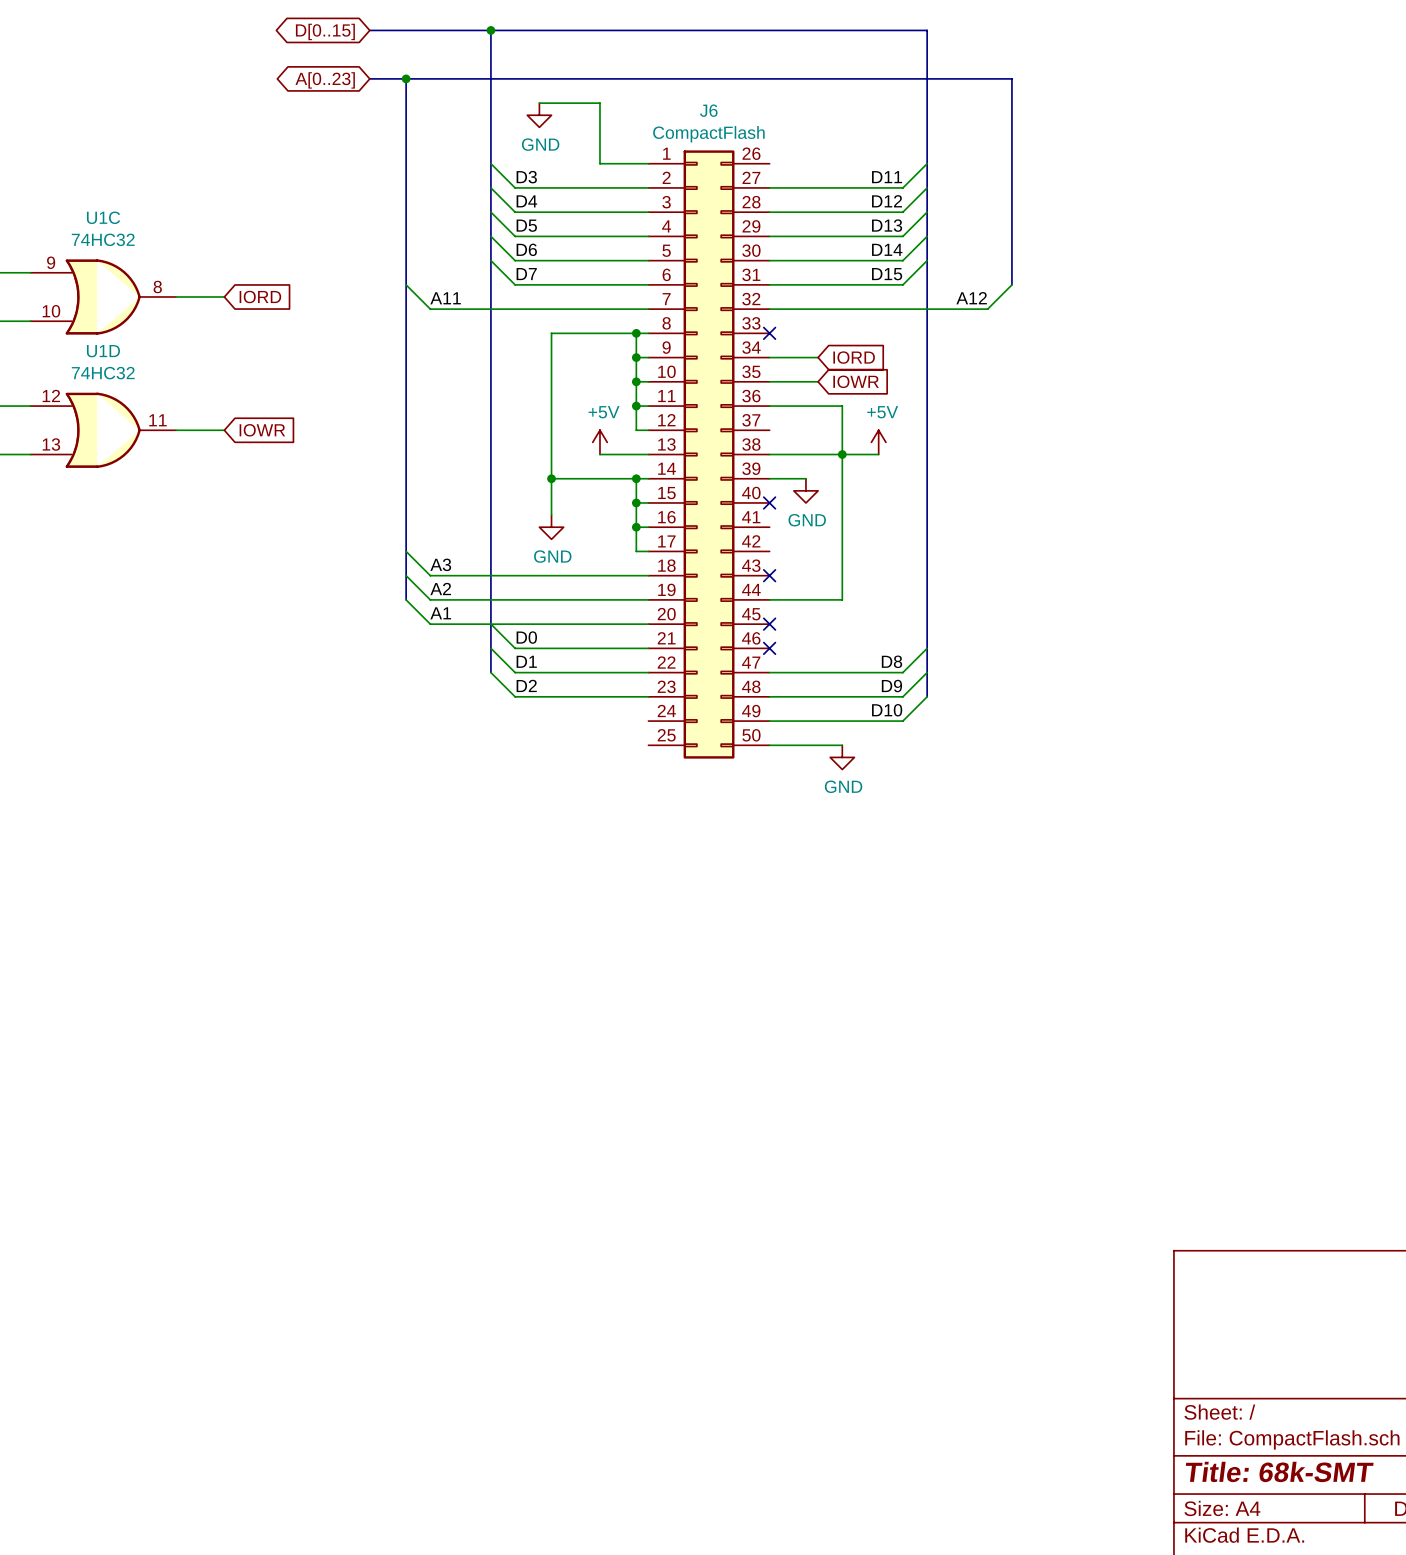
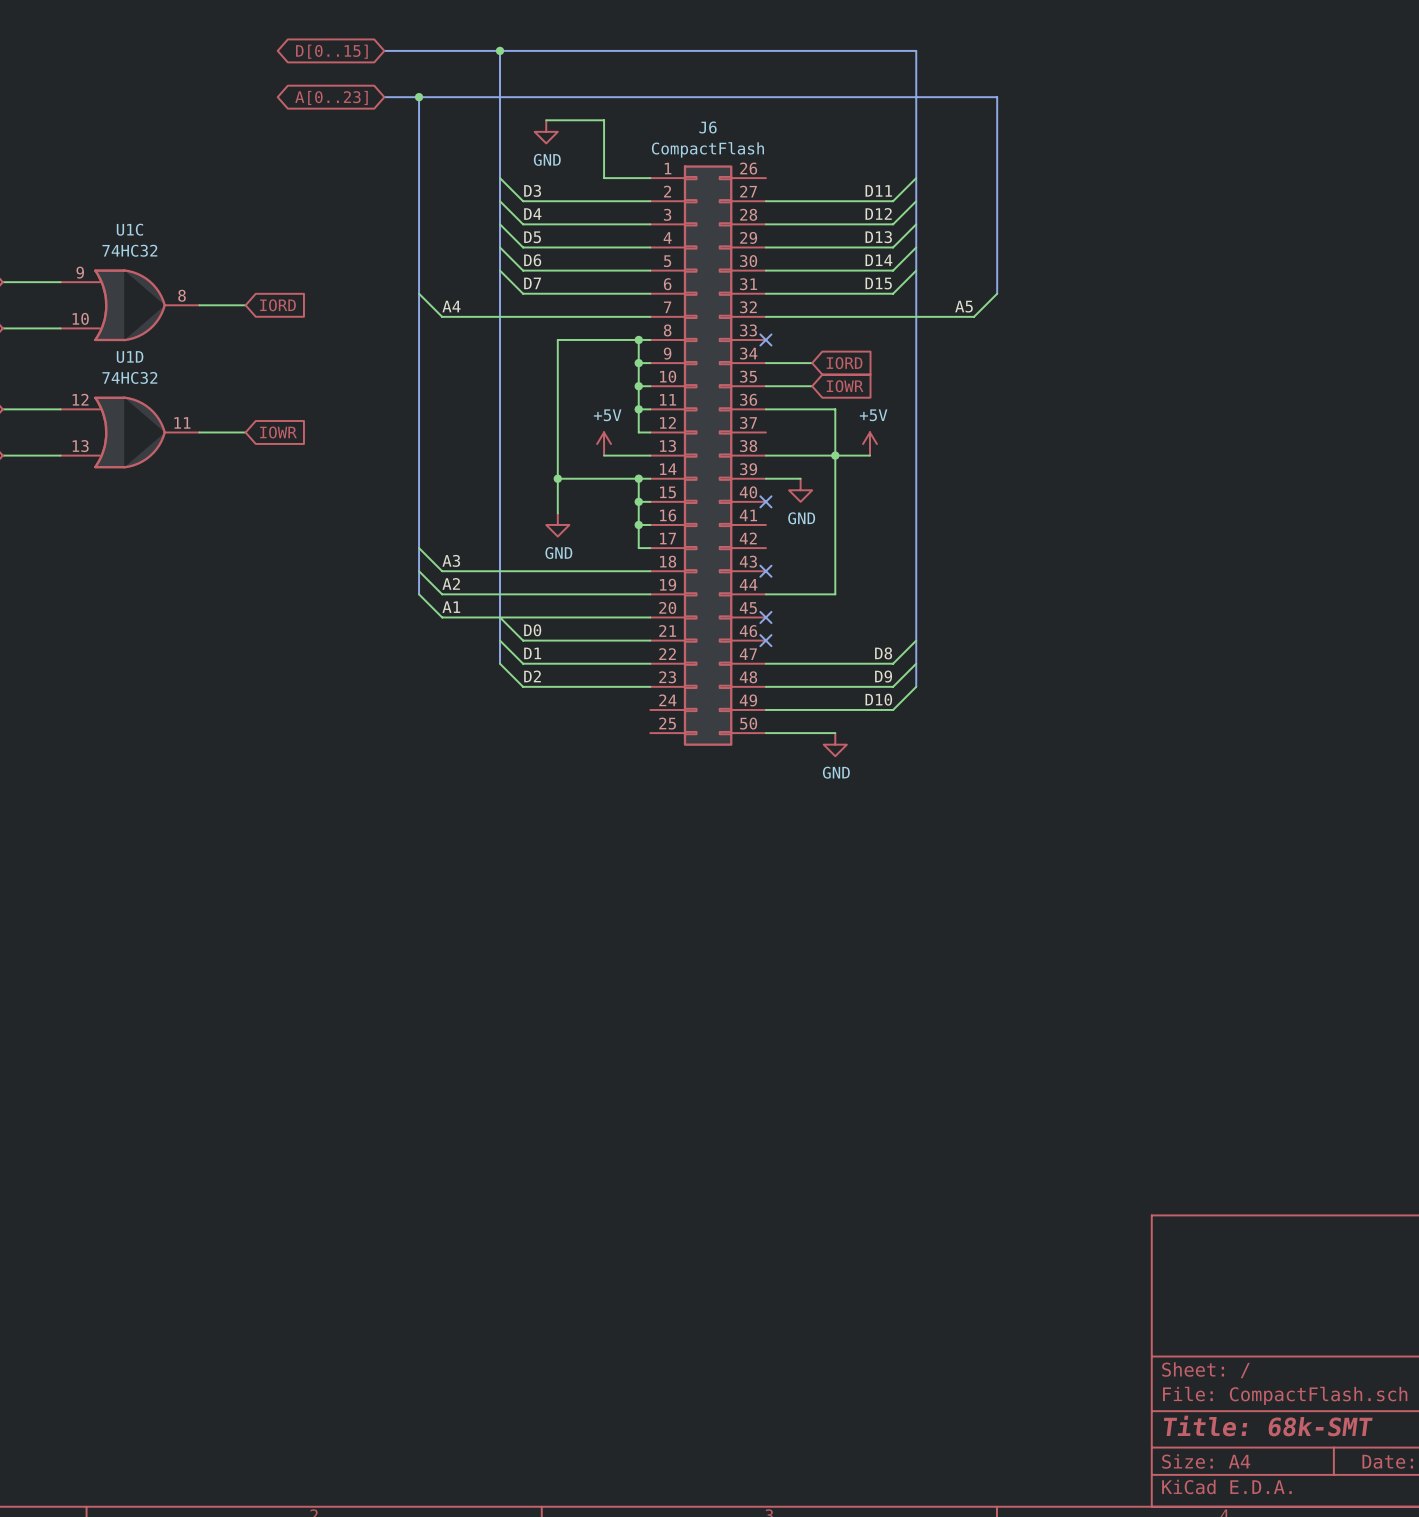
label: A11 (445, 298) -> A4 (451, 306)
label: A12 (971, 298) -> A5 (964, 306)

